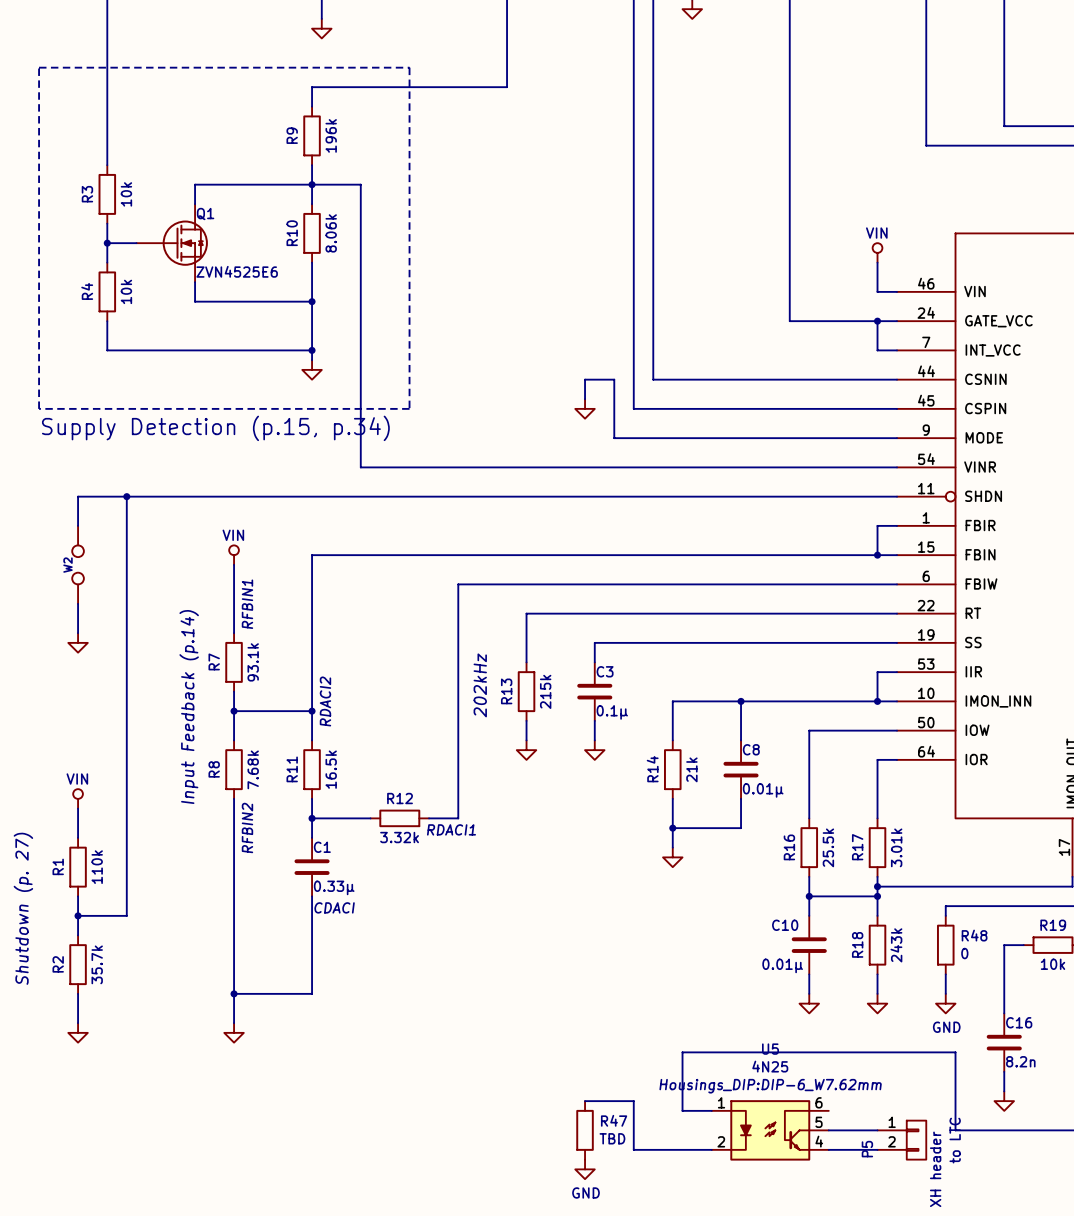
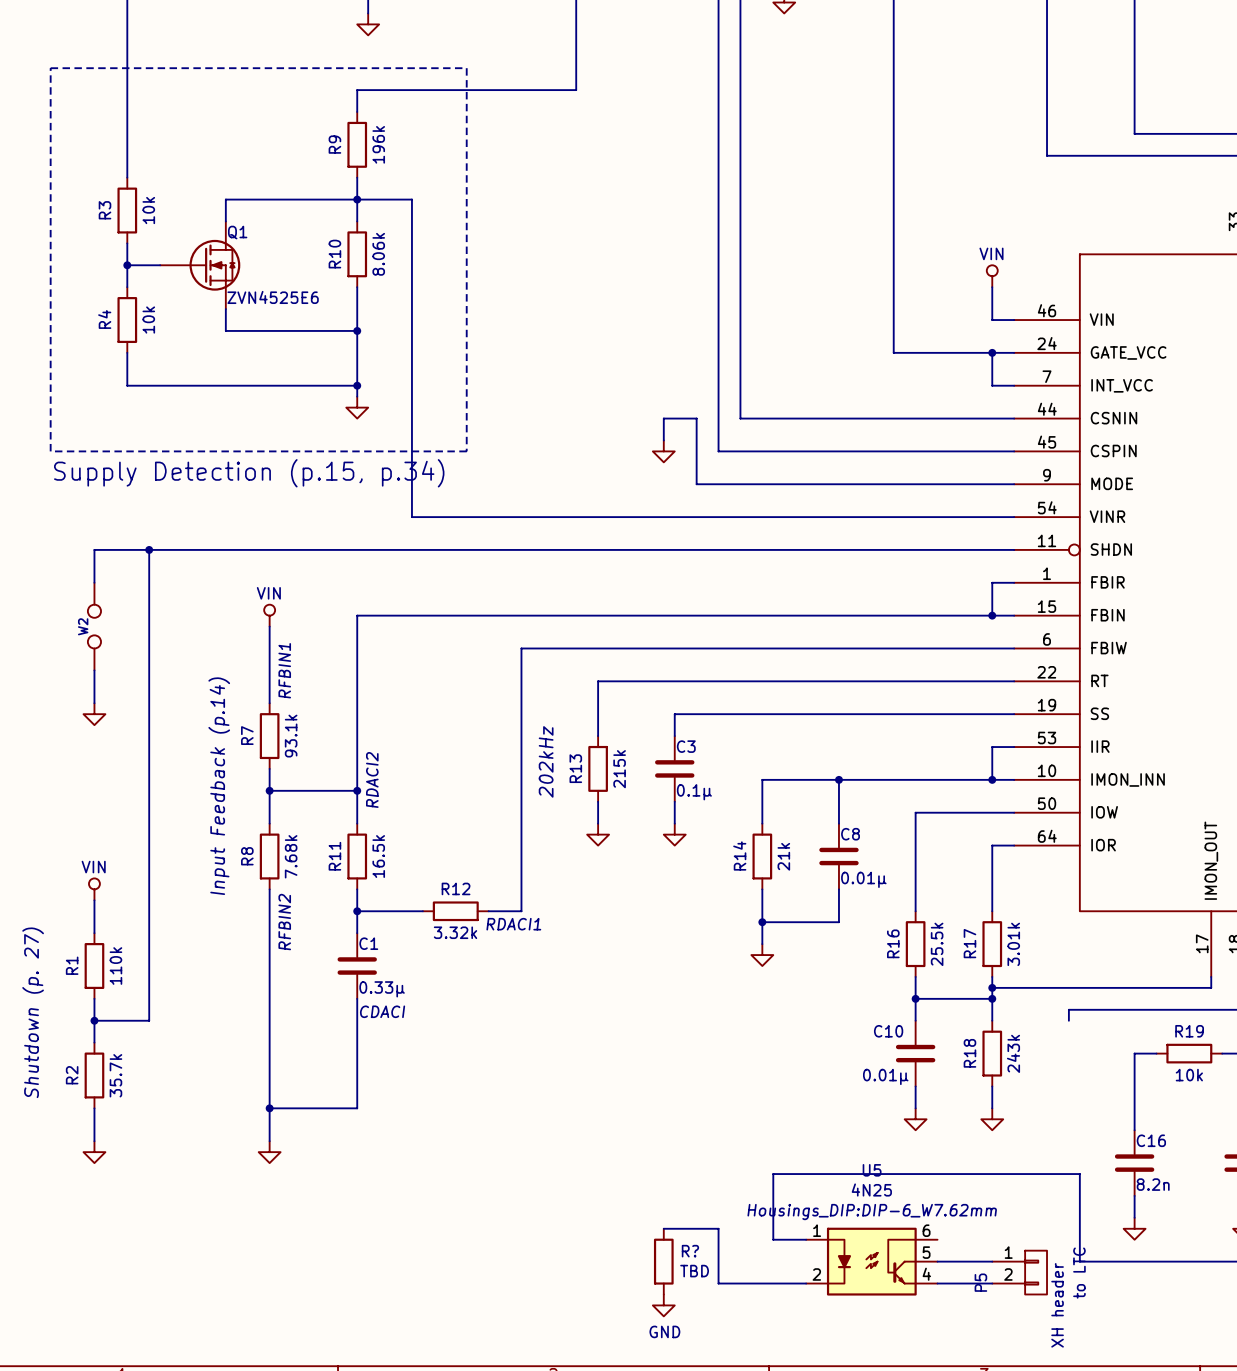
R48: 0 (945, 945) -> none
wire: (945, 974) (945, 993) -> none
power symbol: GND (945, 1003) -> none
R47 name: R47 (614, 1120) -> R? (690, 1251)

